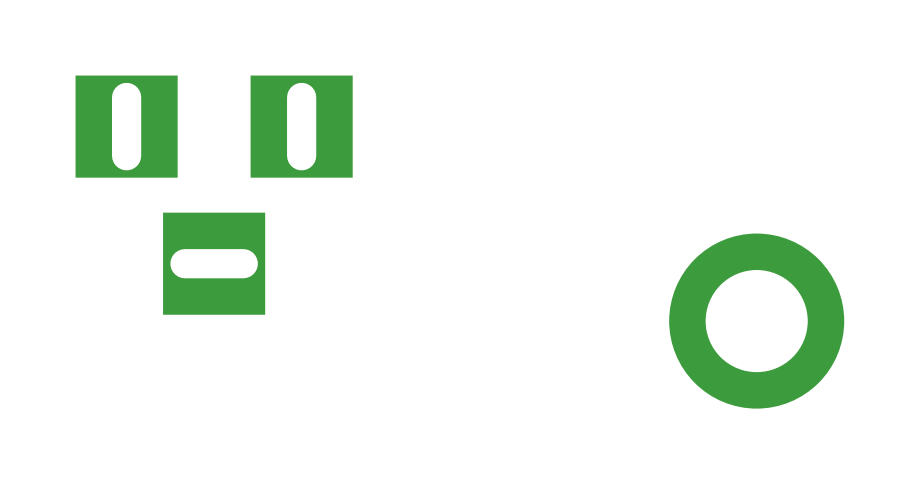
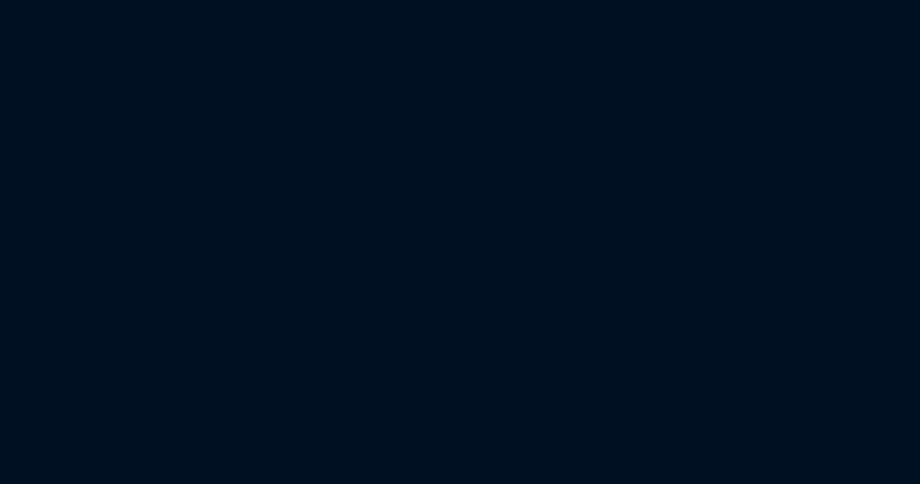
part: (214, 195) -> none
part: (756, 321) -> none

